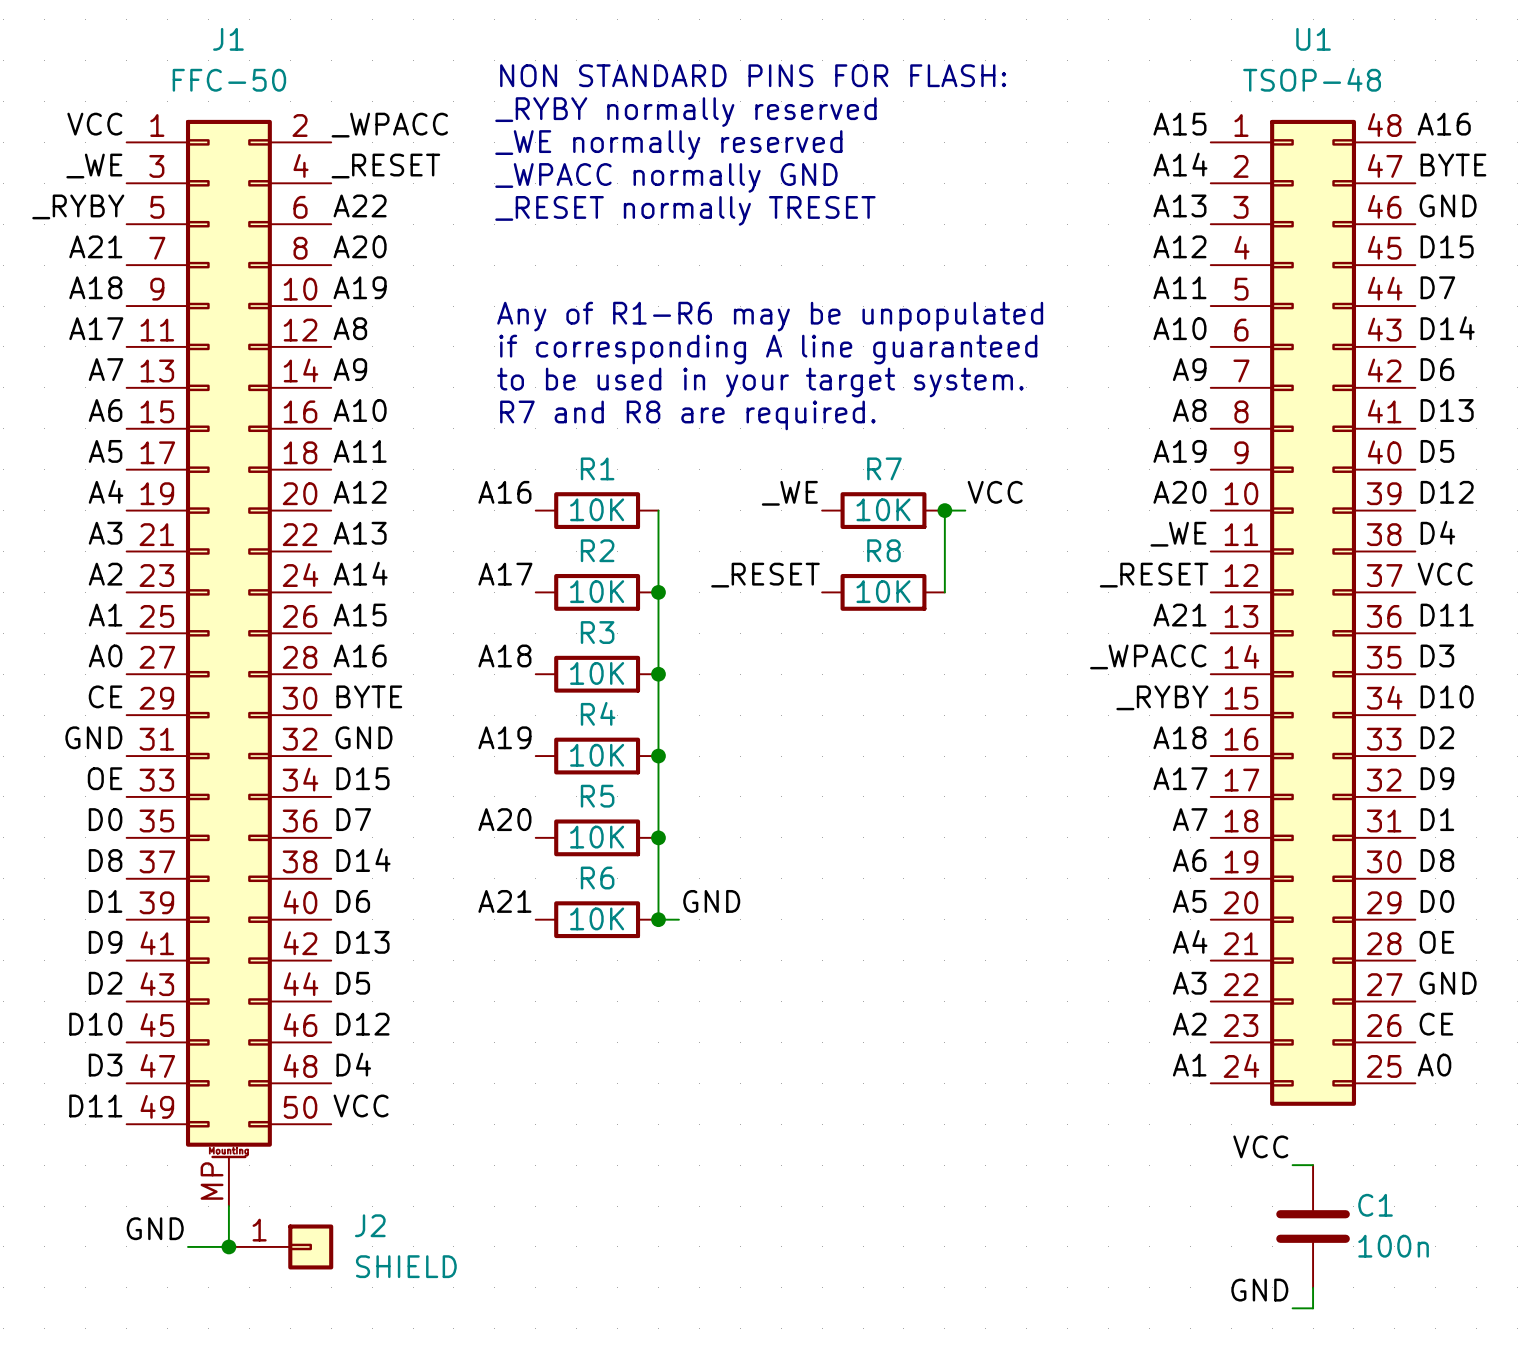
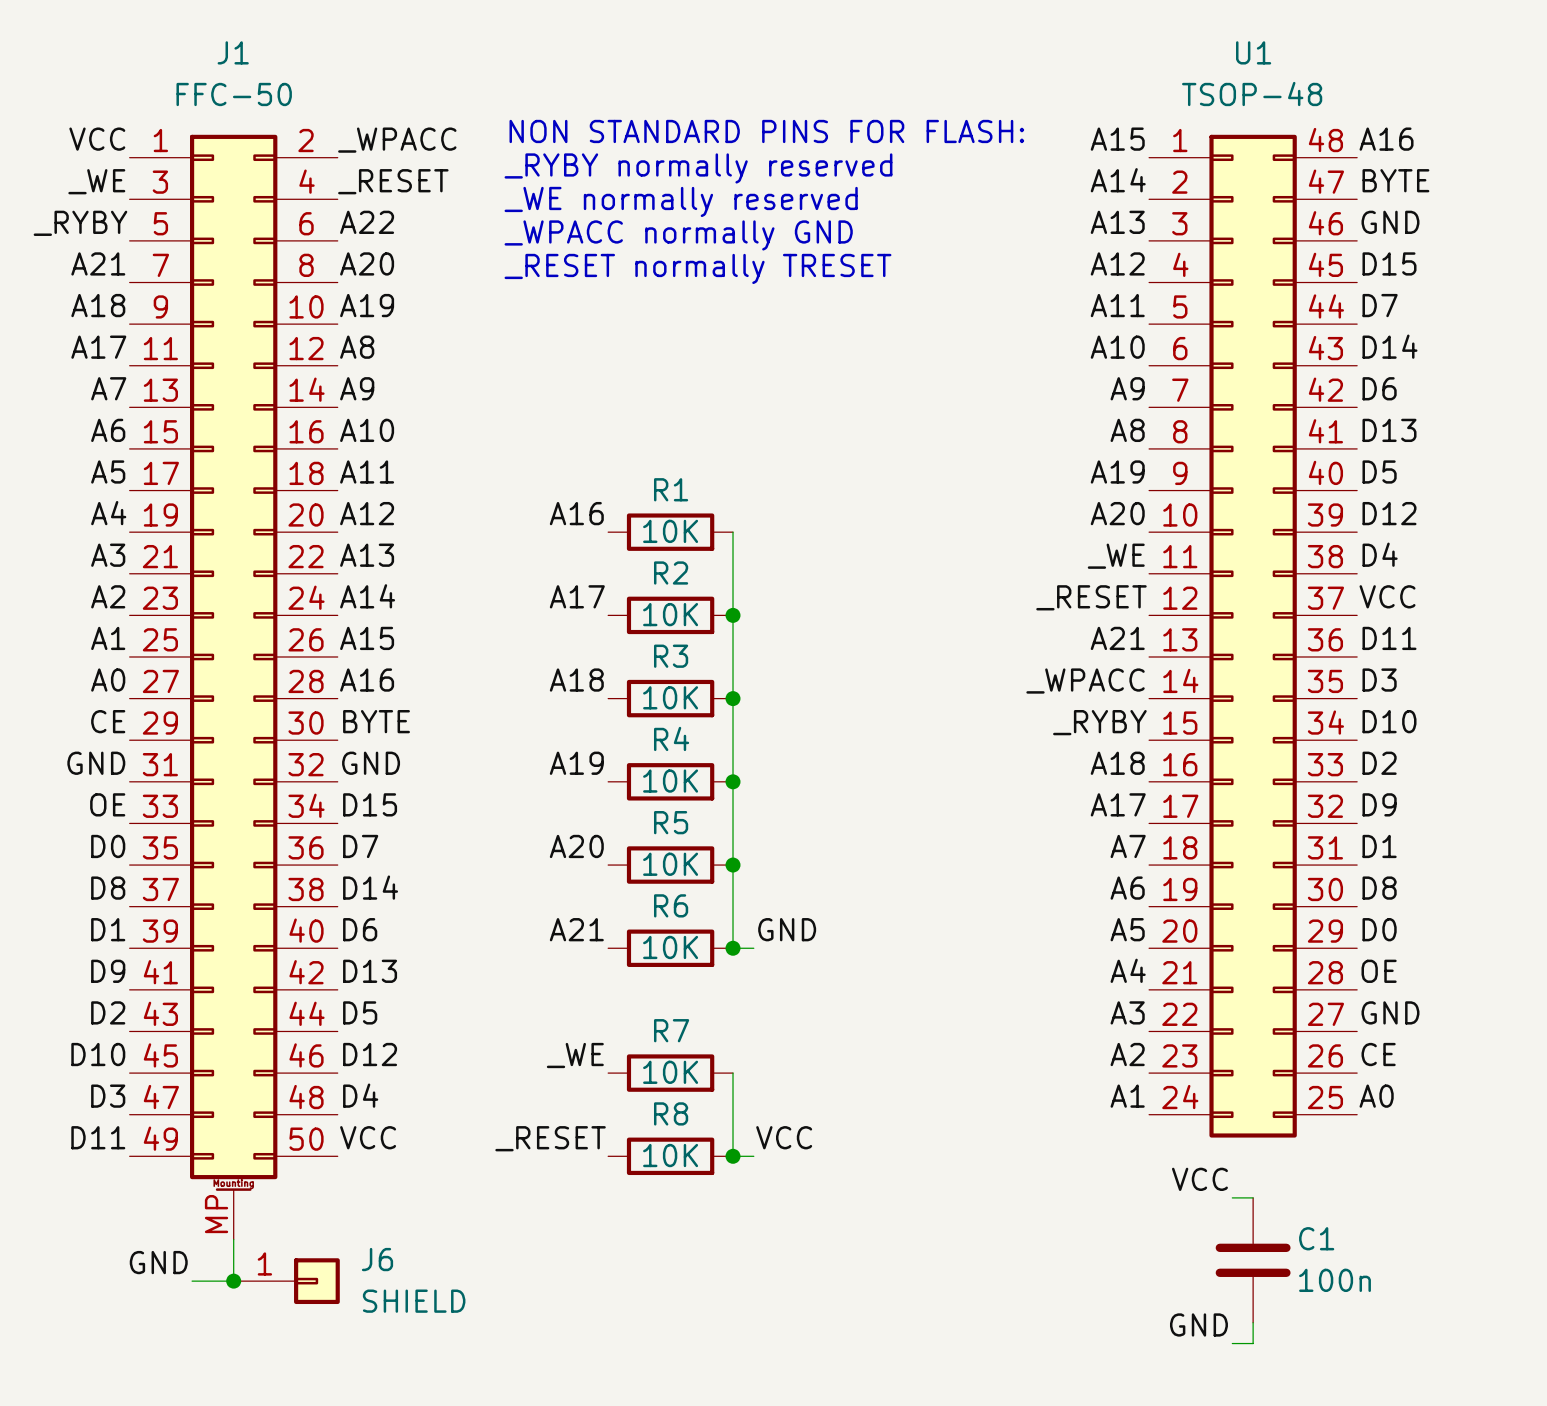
text position: NON STANDARD PINS FOR FLASH: (753, 75) -> NON STANDARD PINS FOR FLASH: (766, 131)
text position: _RYBY normally reserved (685, 112) -> _RYBY normally reserved (698, 168)
label position: A15 (1179, 124) -> A15 (1117, 139)
label position: A16 (1444, 124) -> A16 (1386, 139)
text position: _WE normally reserved (668, 144) -> _WE normally reserved (681, 201)
label position: A14 (1180, 164) -> A14 (1118, 180)
label position: BYTE (1453, 165) -> BYTE (1395, 180)
text position: _WPACC normally GND (666, 177) -> _WPACC normally GND (678, 235)
label position: A13 (1179, 205) -> A13 (1117, 222)
label position: GND (1448, 205) -> GND (1390, 222)
text position: _RESET normally TRESET (685, 210) -> _RESET normally TRESET (697, 268)
label position: A12 (1179, 246) -> A12 (1117, 263)
label position: D15 (1447, 246) -> D15 (1389, 263)
label position: A11 (1179, 287) -> A11 (1117, 305)
label position: D7 (1437, 287) -> D7 (1380, 305)
text: Any of R1-R6 may be unpopulated (770, 316) -> none
label position: A10 (1179, 328) -> A10 (1117, 347)
label position: D14 (1447, 328) -> D14 (1389, 346)
text: if corresponding A line guaranteed (768, 349) -> none
label position: A9 (1189, 369) -> A9 (1127, 388)
label position: D6 (1437, 369) -> D6 (1379, 388)
text: to be used in your target system. (760, 382) -> none
label position: A8 (1189, 410) -> A8 (1127, 430)
label position: D13 (1447, 410) -> D13 (1389, 430)
text: R7 and R8 are required. (687, 415) -> none
label position: A19 (1179, 451) -> A19 (1117, 471)
label position: D5 (1437, 451) -> D5 (1379, 471)
label position: A16 (504, 492) -> A16 (576, 513)
label: VCC (995, 492) -> none
label position: A20 (1179, 492) -> A20 (1117, 513)
label position: D12 (1447, 492) -> D12 (1389, 513)
label: _WE (789, 493) -> none
R1 position: (597, 510) -> (670, 532)
wire: (658, 510) (658, 919) (678, 919) -> (733, 532) (733, 948) (753, 948)
R7 position: (883, 510) -> (670, 1073)
junction: (944, 510) -> none
wire: (965, 510) (944, 510) (944, 592) -> none
label position: D4 (1437, 532) -> D4 (1380, 554)
label position: _WE (1178, 534) -> _WE (1116, 556)
label position: A17 (505, 574) -> A17 (577, 596)
label position: VCC (1445, 574) -> VCC (1387, 596)
label: _RESET (765, 575) -> none
label position: _RESET (1154, 575) -> _RESET (1091, 597)
R2 position: (597, 592) -> (670, 615)
junction: (658, 592) -> none
junction: none -> (733, 615)
R8 position: (883, 592) -> (670, 1156)
U1 position: (1313, 612) -> (1253, 636)
label position: A21 (1179, 615) -> A21 (1117, 638)
label position: D11 (1447, 615) -> D11 (1389, 638)
label position: A18 (504, 655) -> A18 (576, 680)
label position: D3 (1437, 655) -> D3 (1379, 680)
label position: _WPACC (1148, 656) -> _WPACC (1085, 681)
R3 position: (597, 674) -> (670, 698)
junction: (658, 674) -> none
junction: none -> (733, 698)
label position: D10 (1447, 696) -> D10 (1389, 721)
label position: _RYBY (1162, 697) -> _RYBY (1099, 722)
label position: A19 (504, 737) -> A19 (576, 763)
label position: A18 (1179, 737) -> A18 (1117, 763)
label position: D2 (1437, 737) -> D2 (1379, 763)
R4 position: (597, 756) -> (670, 781)
junction: (658, 756) -> none
junction: none -> (733, 781)
label position: A17 (1180, 778) -> A17 (1118, 804)
label position: D9 (1437, 778) -> D9 (1379, 804)
label position: A20 (504, 819) -> A20 (576, 846)
label position: A7 (1190, 819) -> A7 (1128, 846)
label position: D1 (1437, 819) -> D1 (1379, 846)
R5 position: (597, 837) -> (670, 865)
junction: (658, 837) -> none
junction: none -> (733, 865)
label position: A6 (1189, 860) -> A6 (1127, 888)
label position: D8 (1437, 860) -> D8 (1379, 888)
label position: A21 (504, 901) -> A21 (576, 929)
label position: GND (711, 901) -> GND (787, 929)
label position: A5 (1189, 901) -> A5 (1127, 929)
label position: D0 (1437, 901) -> D0 (1379, 929)
R6 position: (597, 919) -> (670, 948)
junction: (658, 919) -> none
junction: none -> (733, 948)
label position: A4 (1190, 941) -> A4 (1128, 970)
label position: OE (1436, 942) -> OE (1379, 971)
label position: A3 (1189, 983) -> A3 (1127, 1012)
label position: GND (1448, 983) -> GND (1390, 1012)
label position: A2 (1189, 1024) -> A2 (1127, 1054)
label position: CE (1436, 1024) -> CE (1378, 1054)
label: none -> _WE (575, 1055)
wire: none -> (733, 1073) (733, 1156) (753, 1156)
label position: A1 (1189, 1065) -> A1 (1127, 1096)
label position: A0 (1434, 1065) -> A0 (1376, 1096)
label: none -> VCC (784, 1137)
label: none -> _RESET (550, 1138)
junction: none -> (733, 1156)
label position: VCC (1260, 1146) -> VCC (1199, 1179)
wire: (1292, 1165) (1313, 1165) -> (1232, 1197) (1253, 1197)
J2 name: J2 (370, 1225) -> J6 (377, 1259)
C1 position: (1313, 1226) -> (1253, 1260)
wire: (1313, 1287) (1313, 1308) (1292, 1308) -> (1253, 1322) (1253, 1343) (1232, 1343)
label position: GND (1259, 1290) -> GND (1198, 1324)

